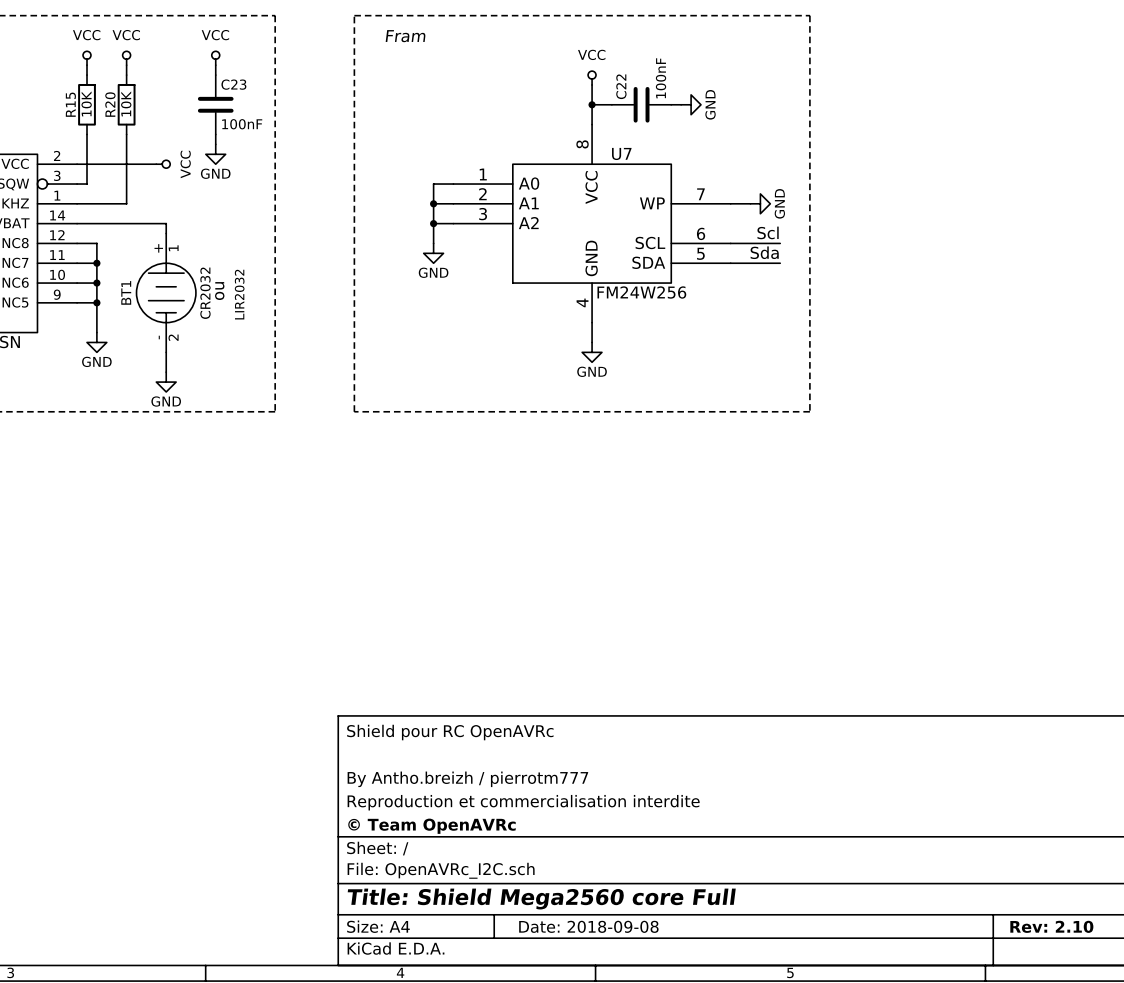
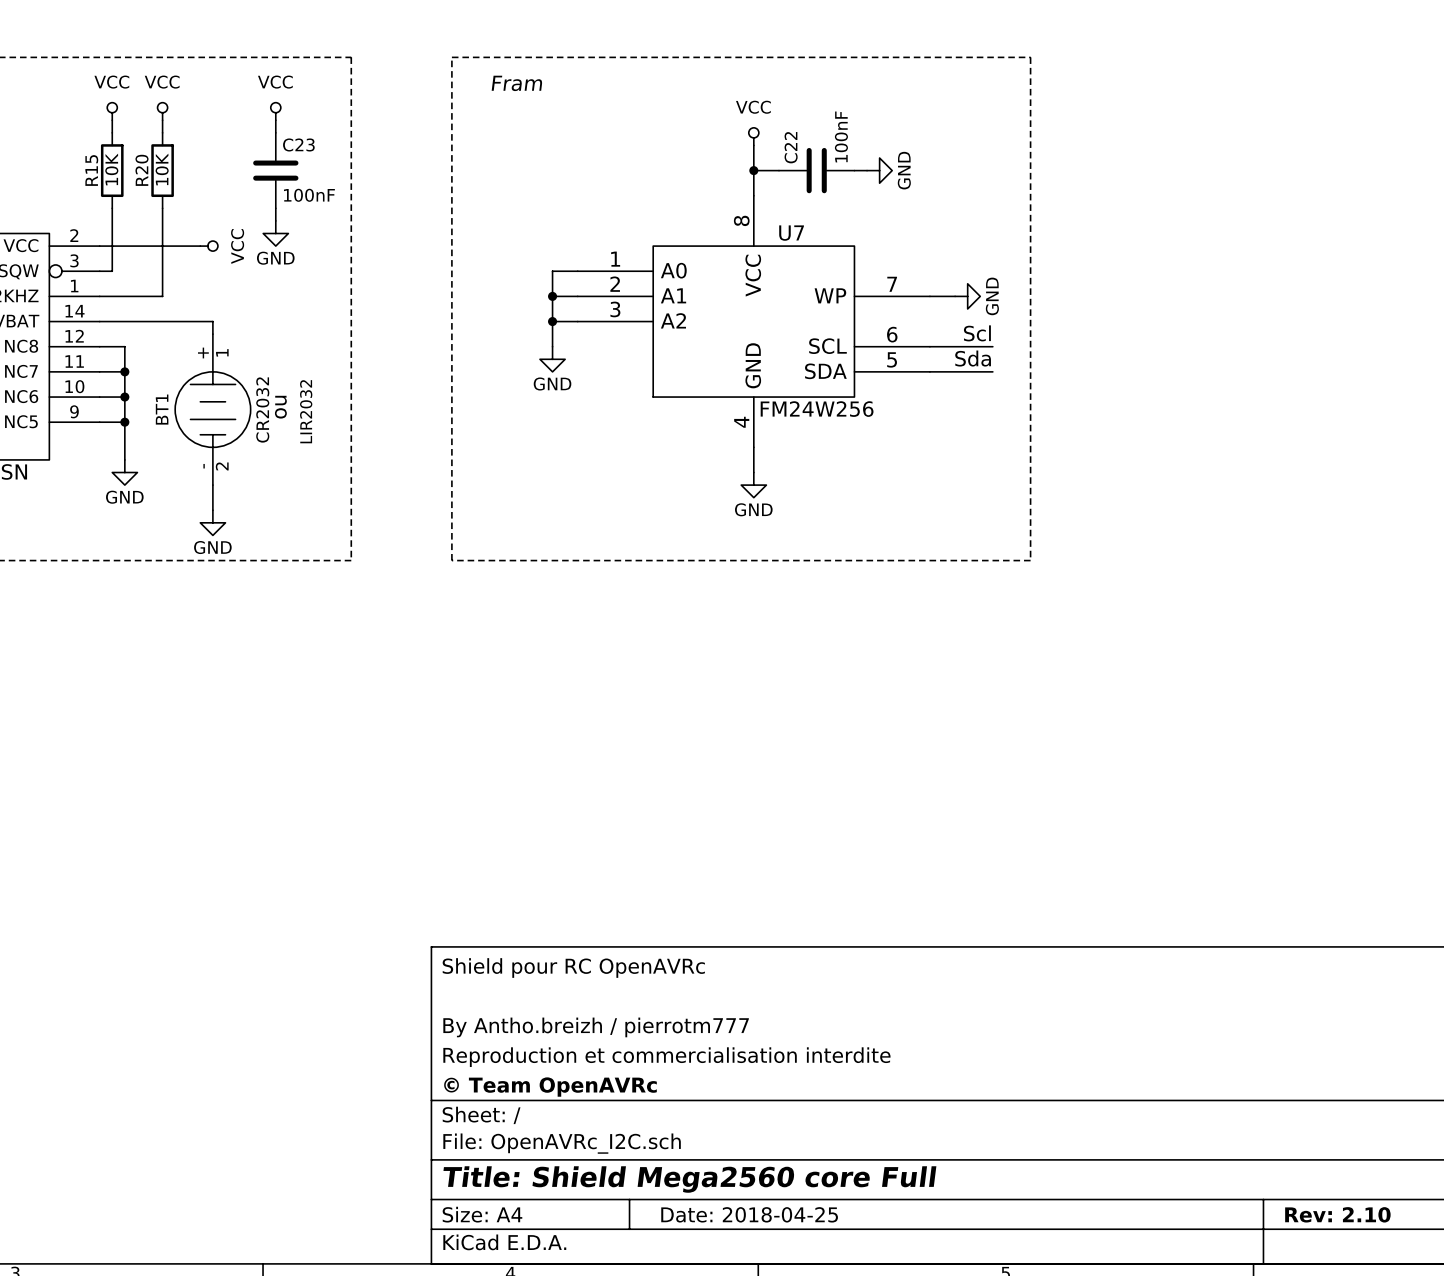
title block: Date: 2018-09-08 (588, 926) -> Date: 2018-04-25 (749, 1214)

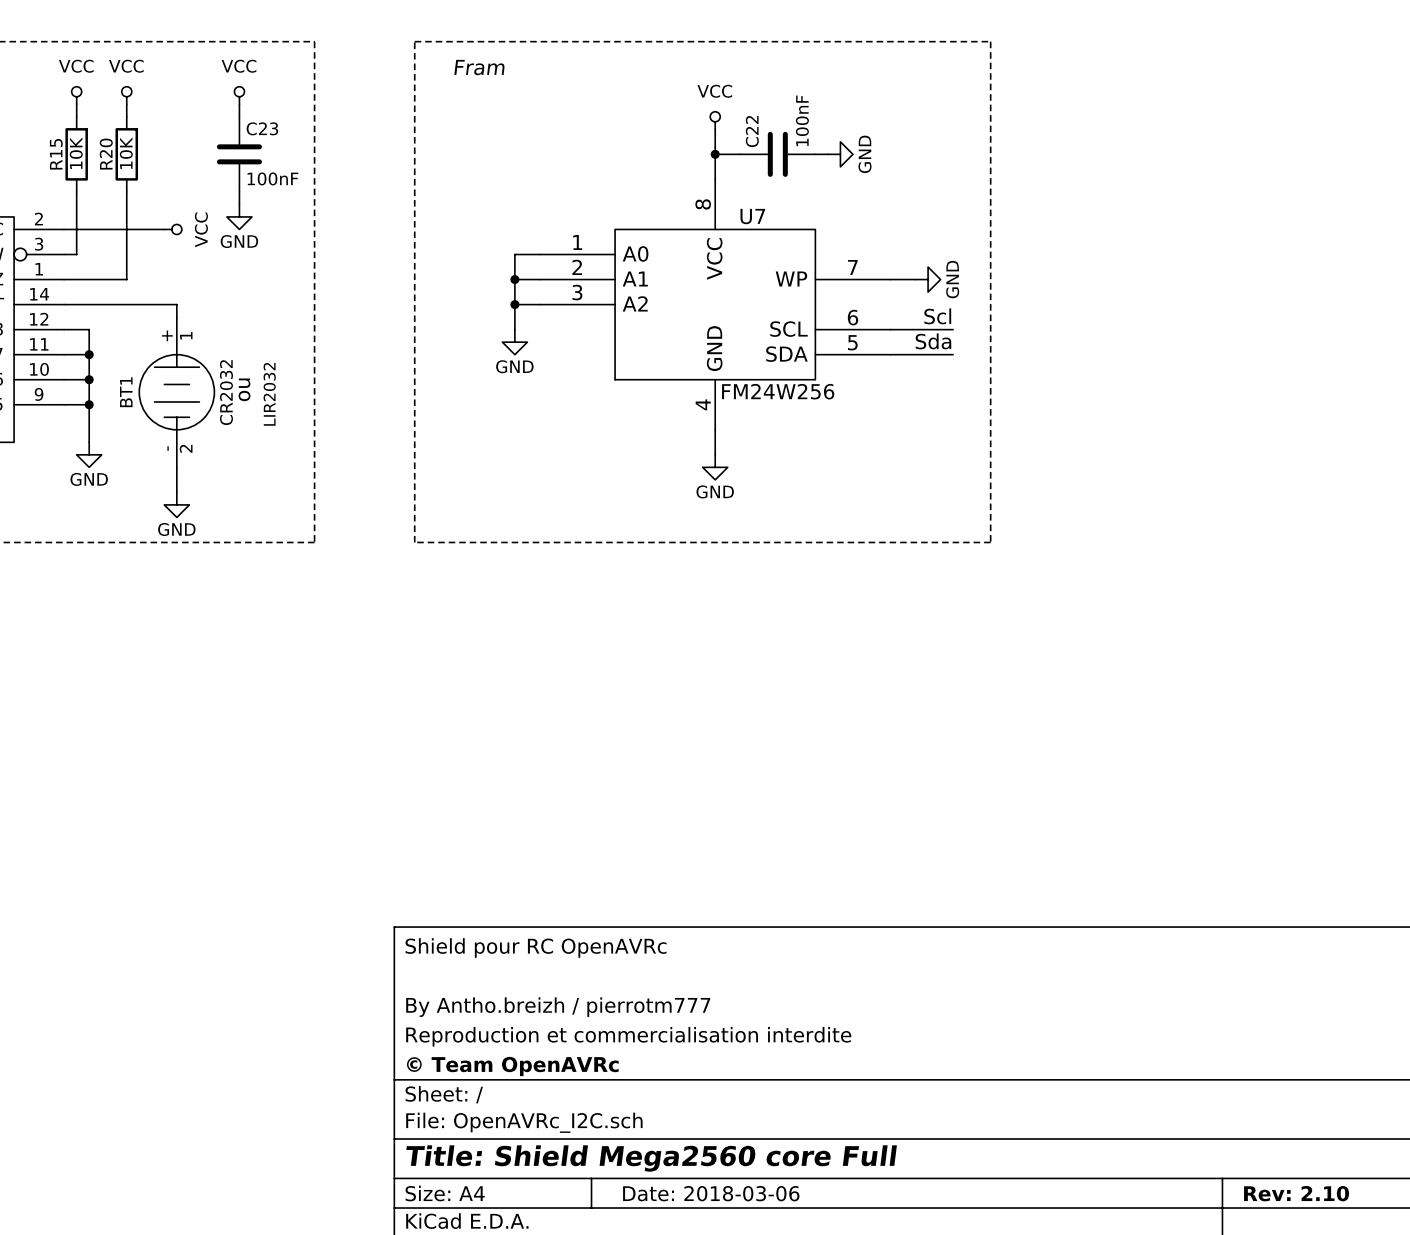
title block: Date: 2018-04-25 (749, 1214) -> Date: 2018-03-06 (711, 1193)

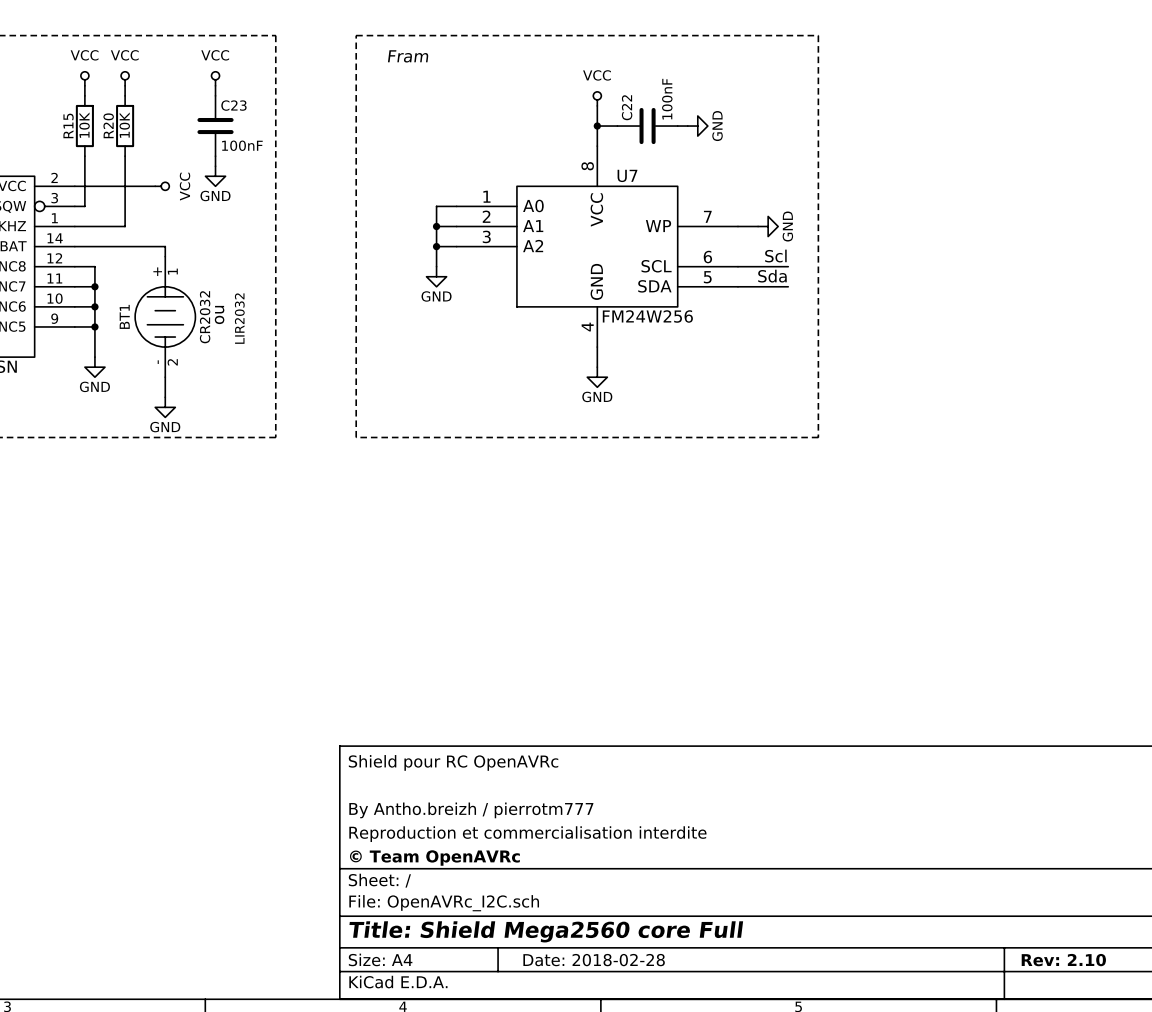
title block: Date: 2018-03-06 (711, 1193) -> Date: 2018-02-28 (594, 960)

